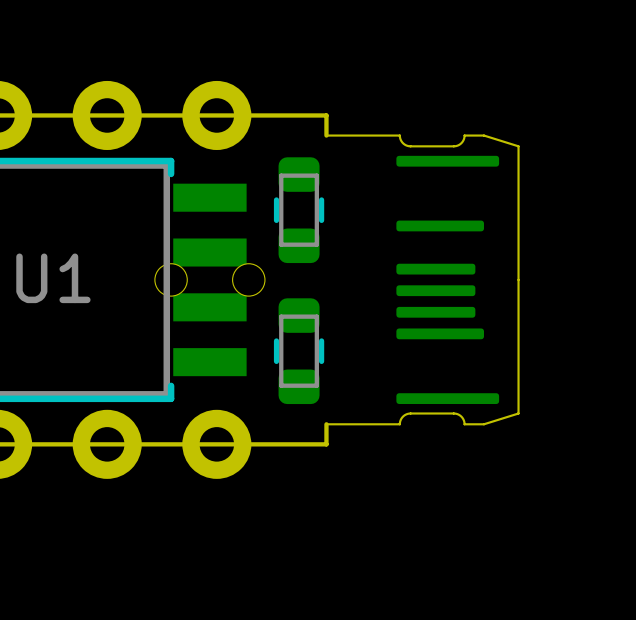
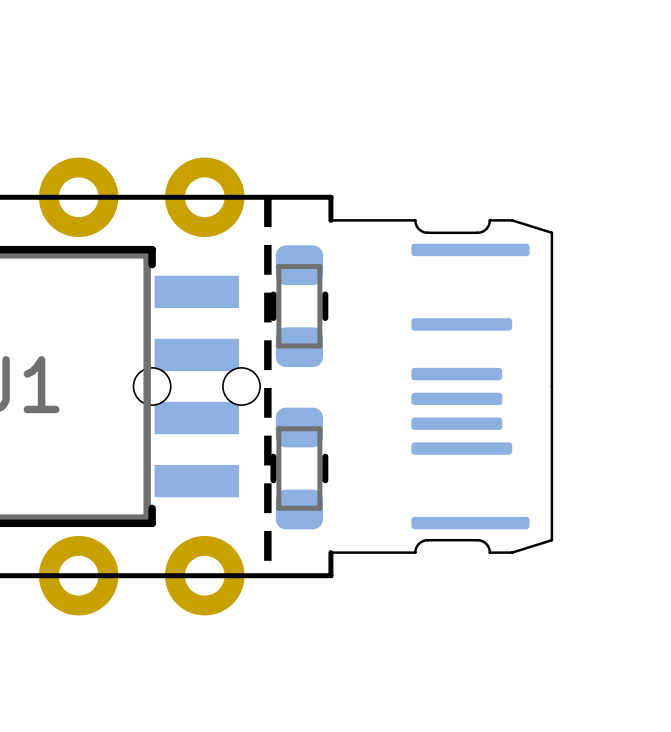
line: none -> (267, 197) (267, 575)

